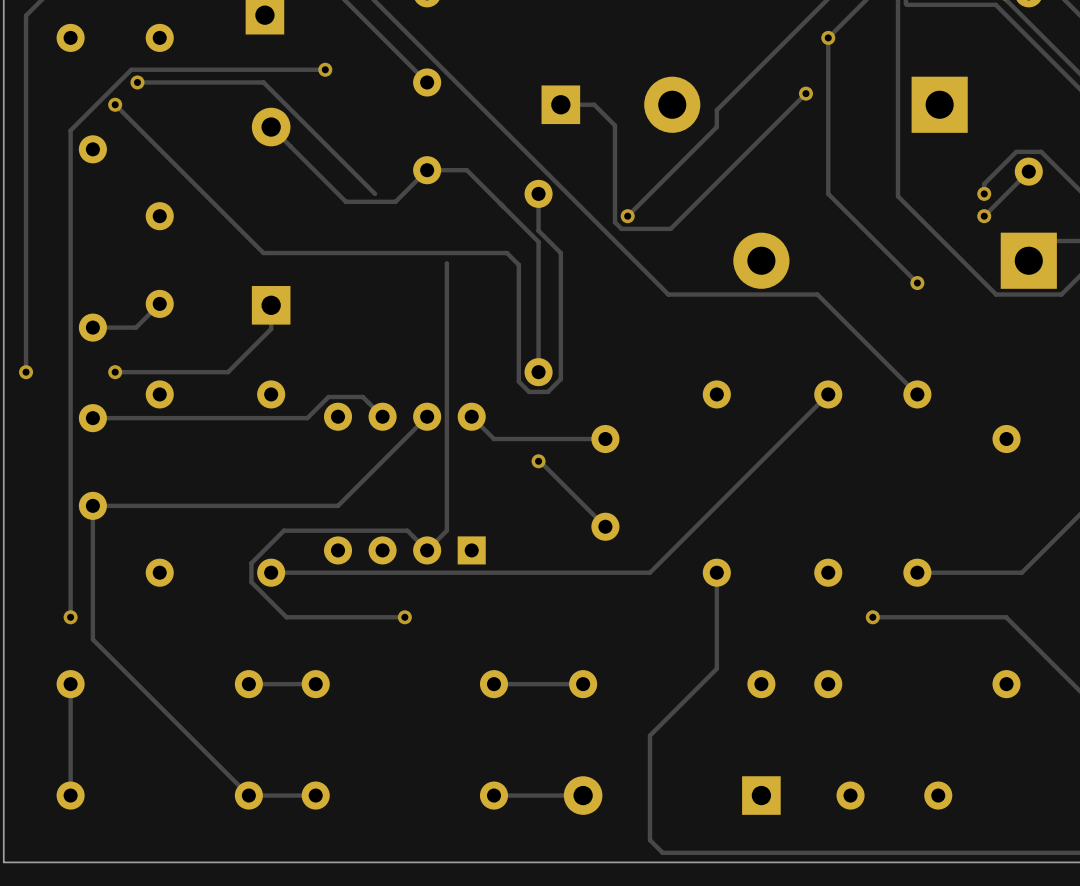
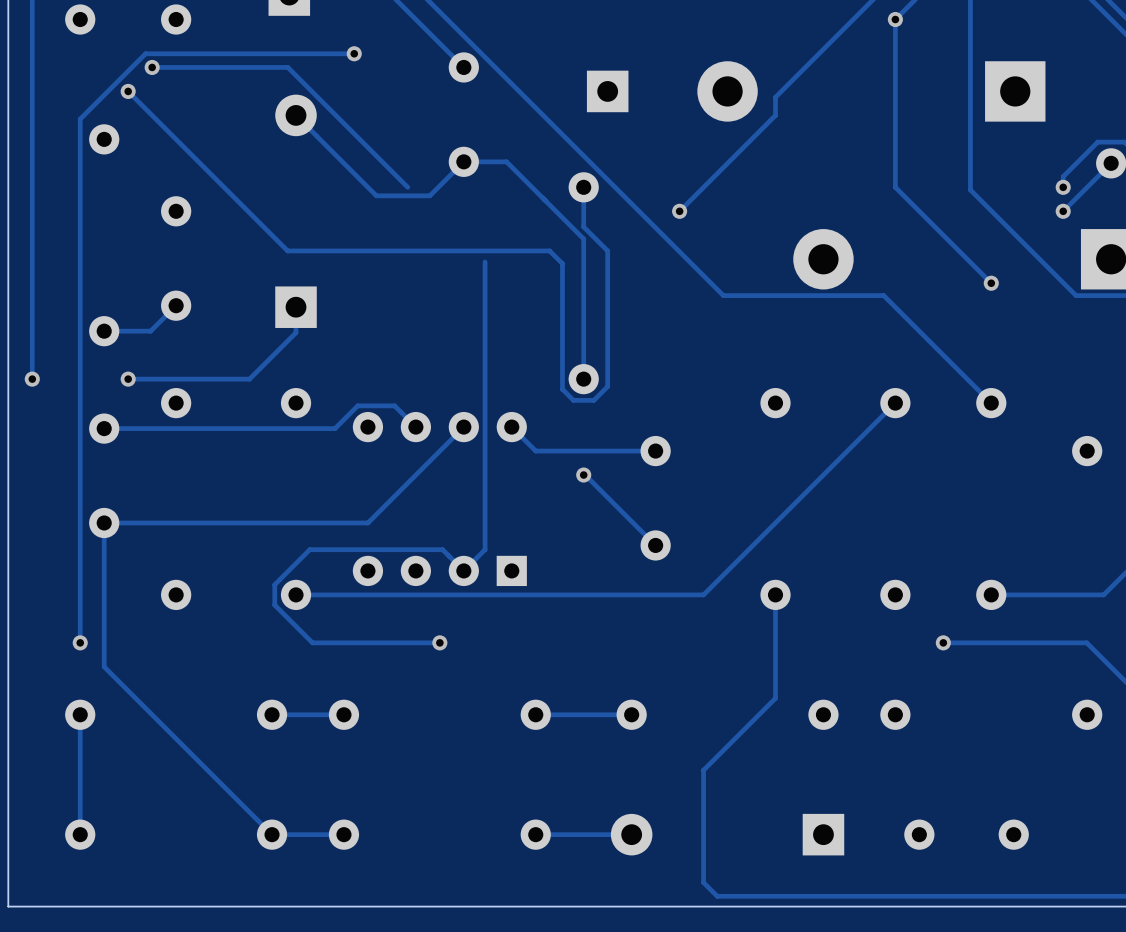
track: (805, 93) (670, 228) (621, 228) (614, 222) (614, 125) (594, 104) (560, 104) -> none
via: (805, 93) -> none

